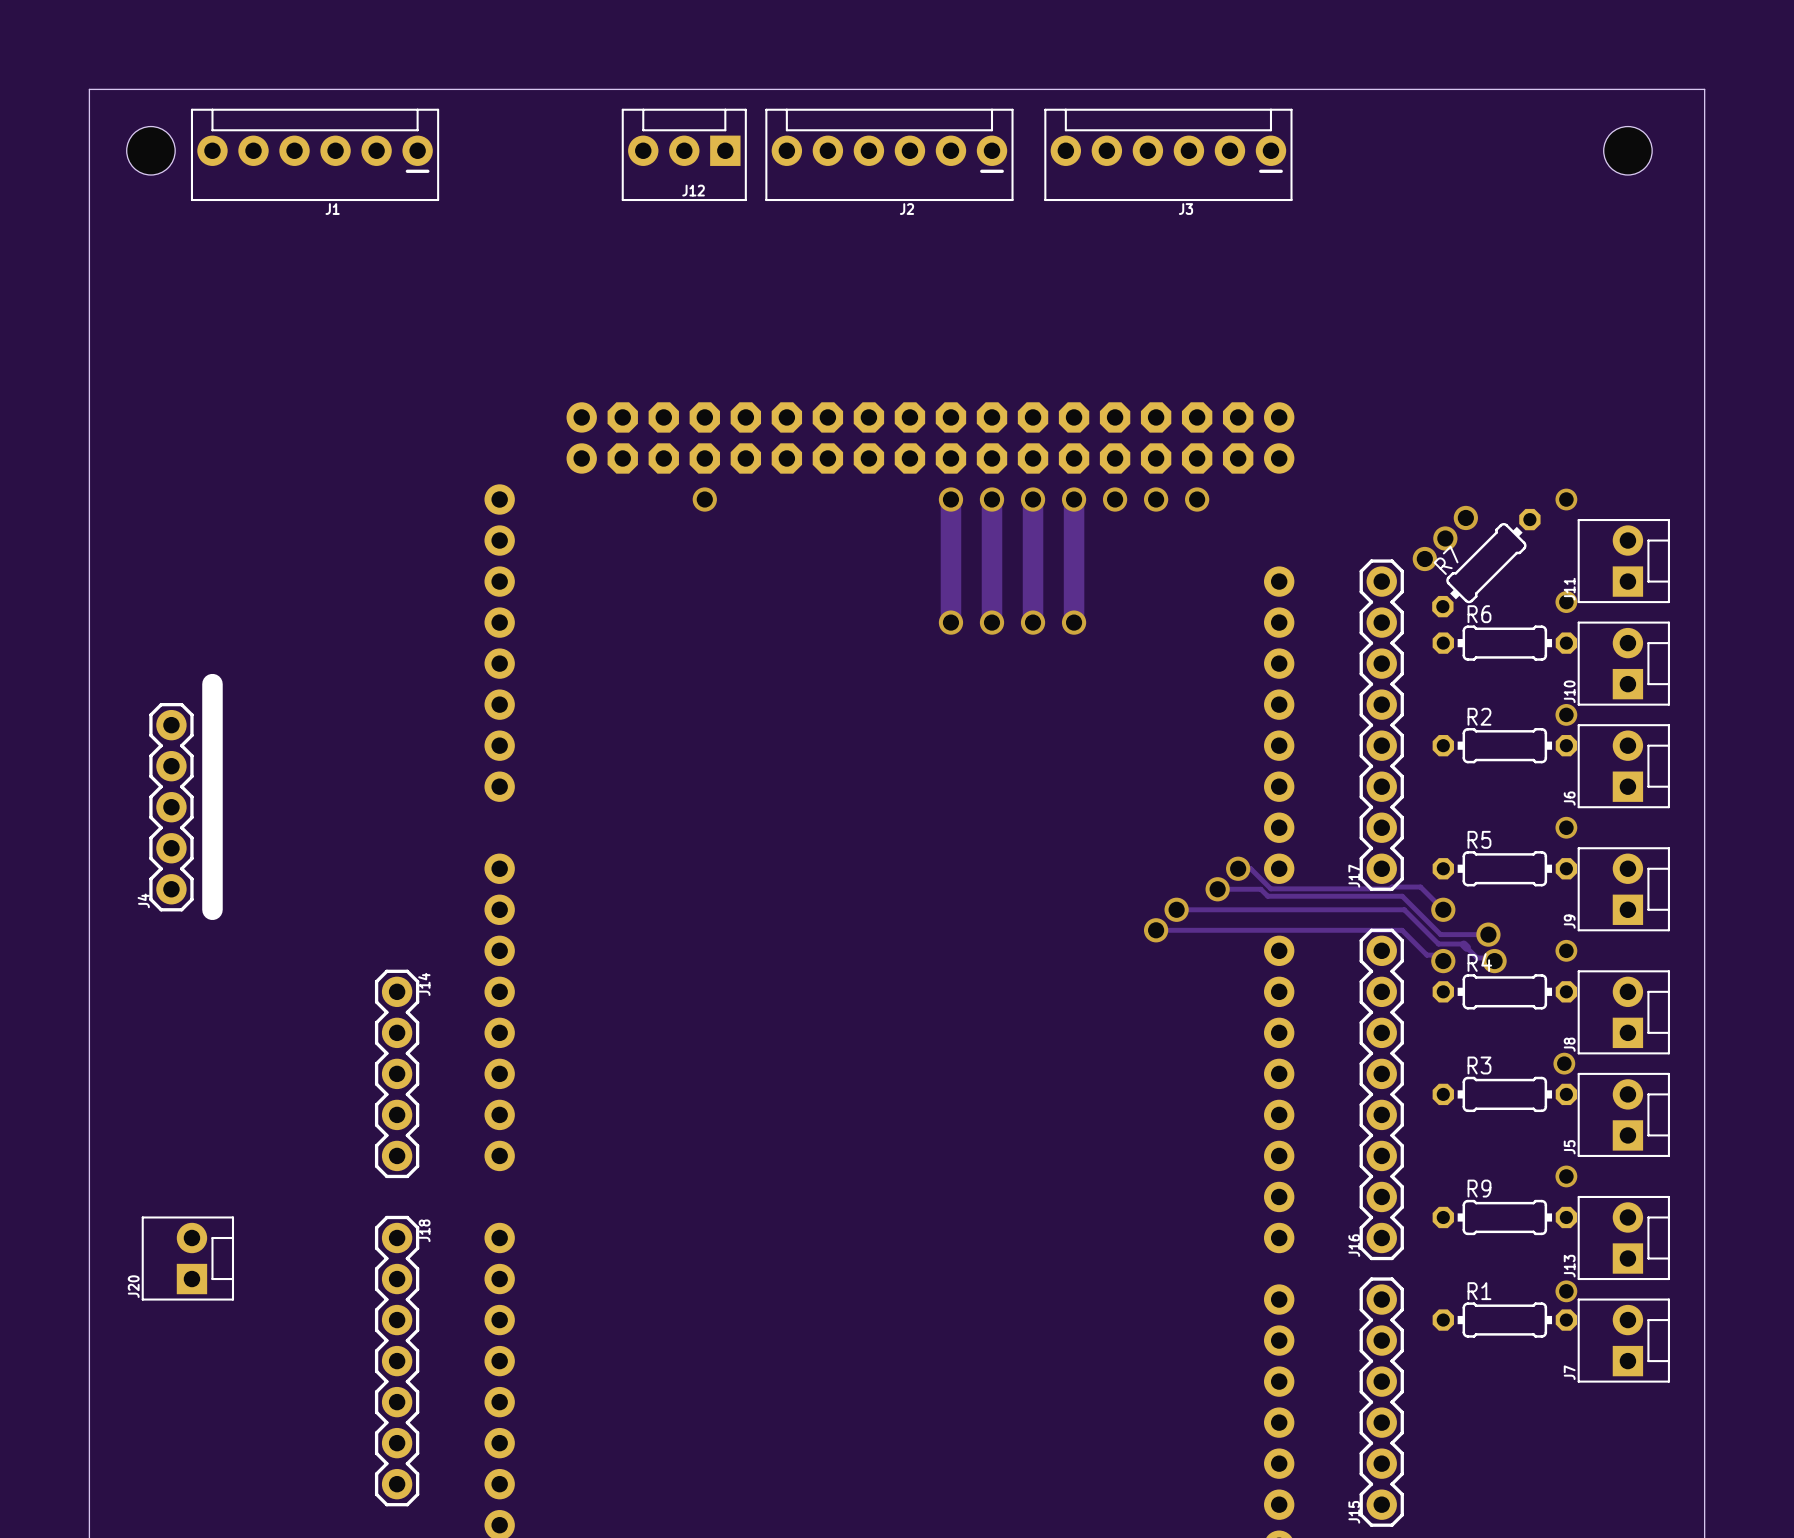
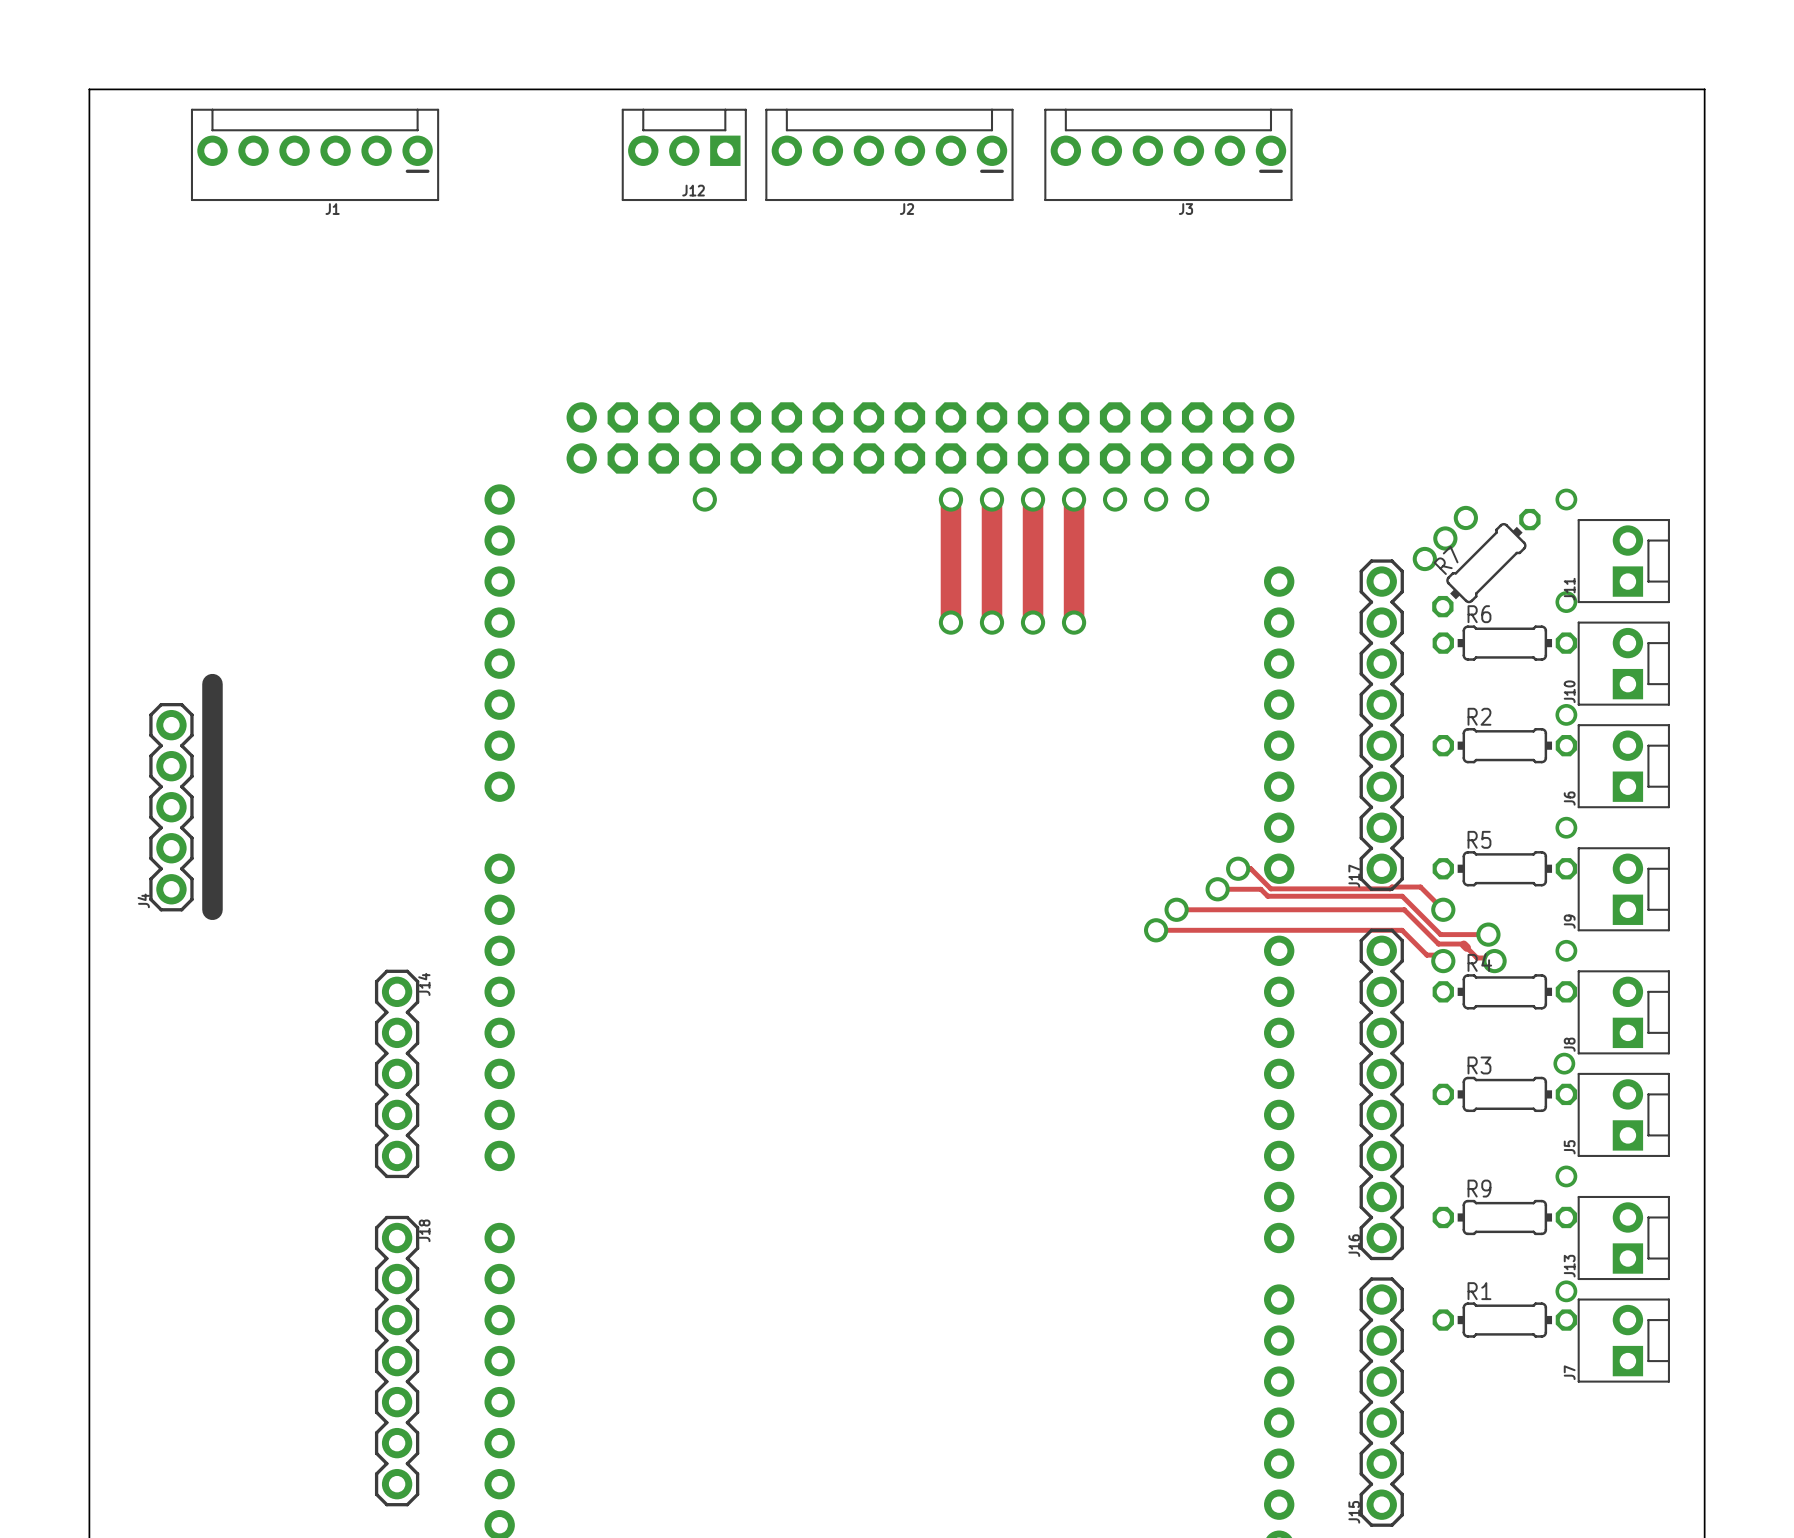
hole: (150, 150) -> none
hole: (1627, 150) -> none
J20: (187, 1258) -> none

